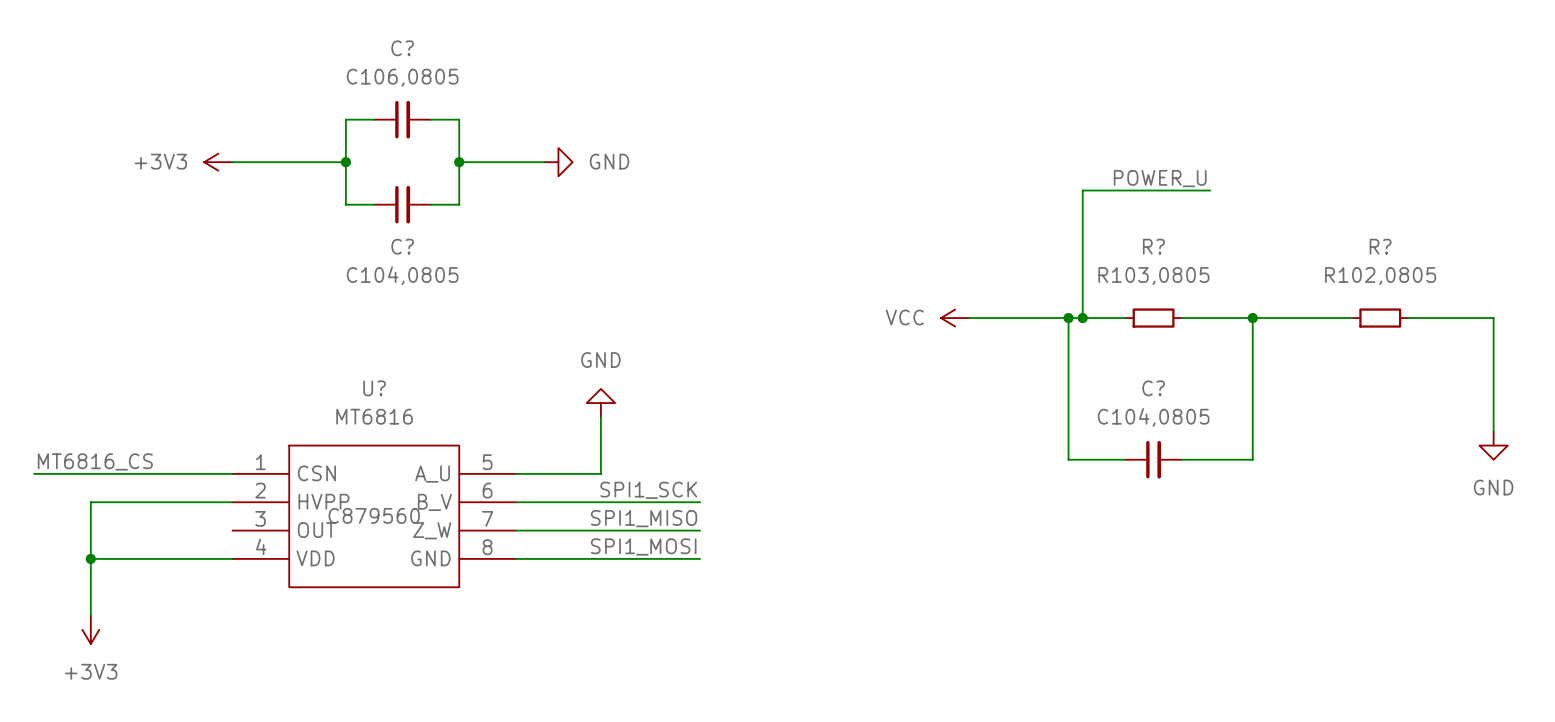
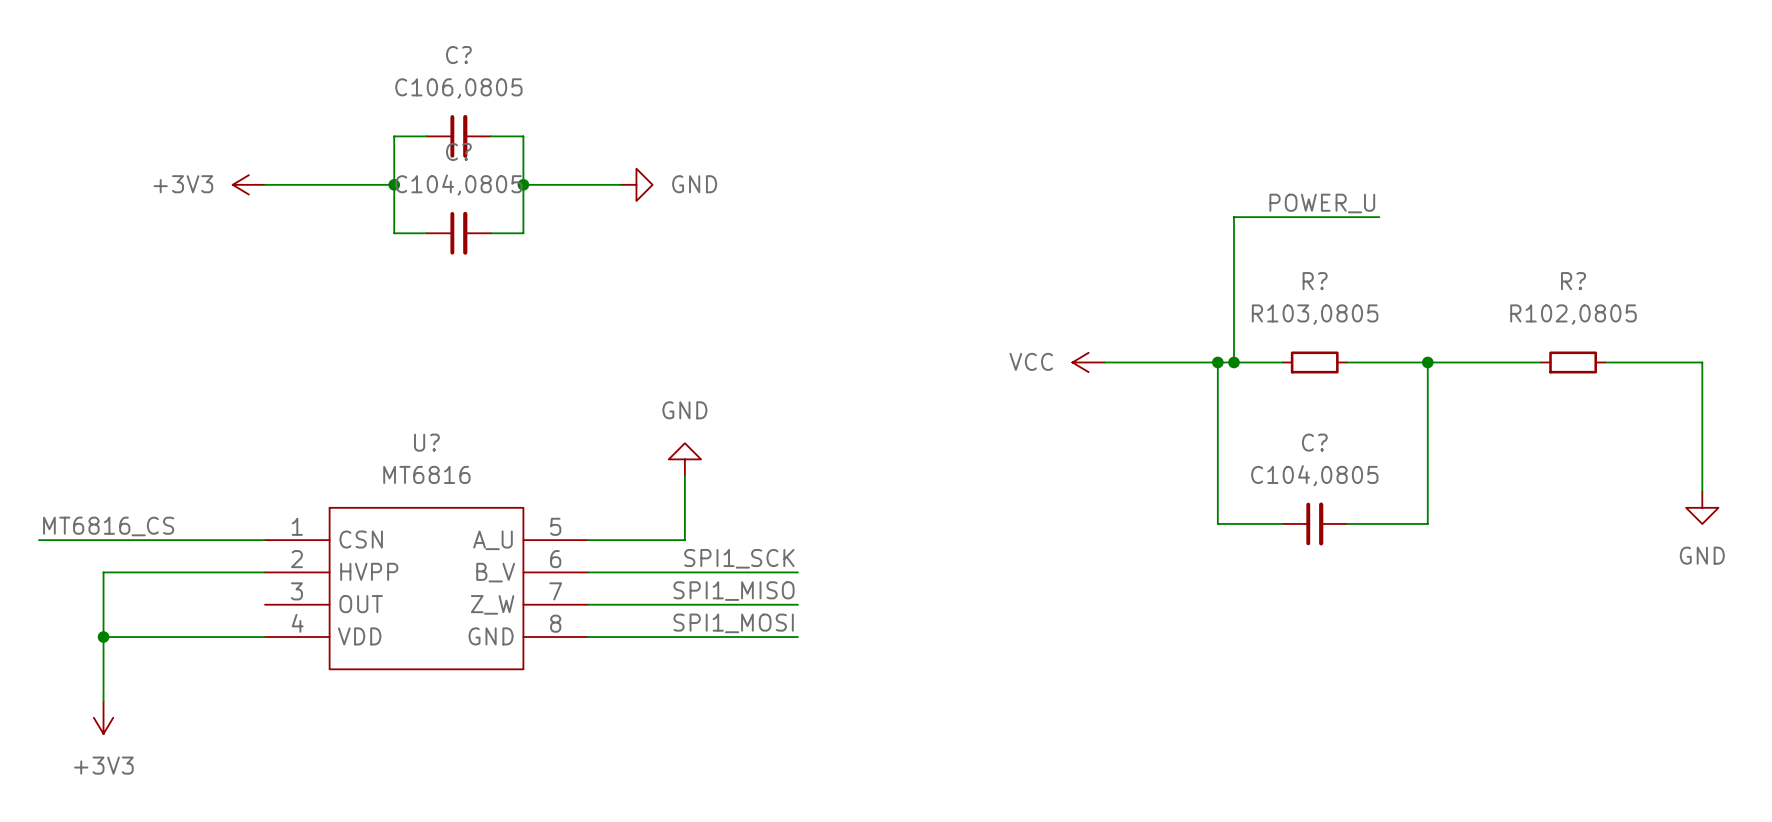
C? name position: C? (402, 246) -> C? (458, 151)
C? value position: C104,0805 (402, 275) -> C104,0805 (458, 185)
U? text: C879560 (374, 515) -> none

